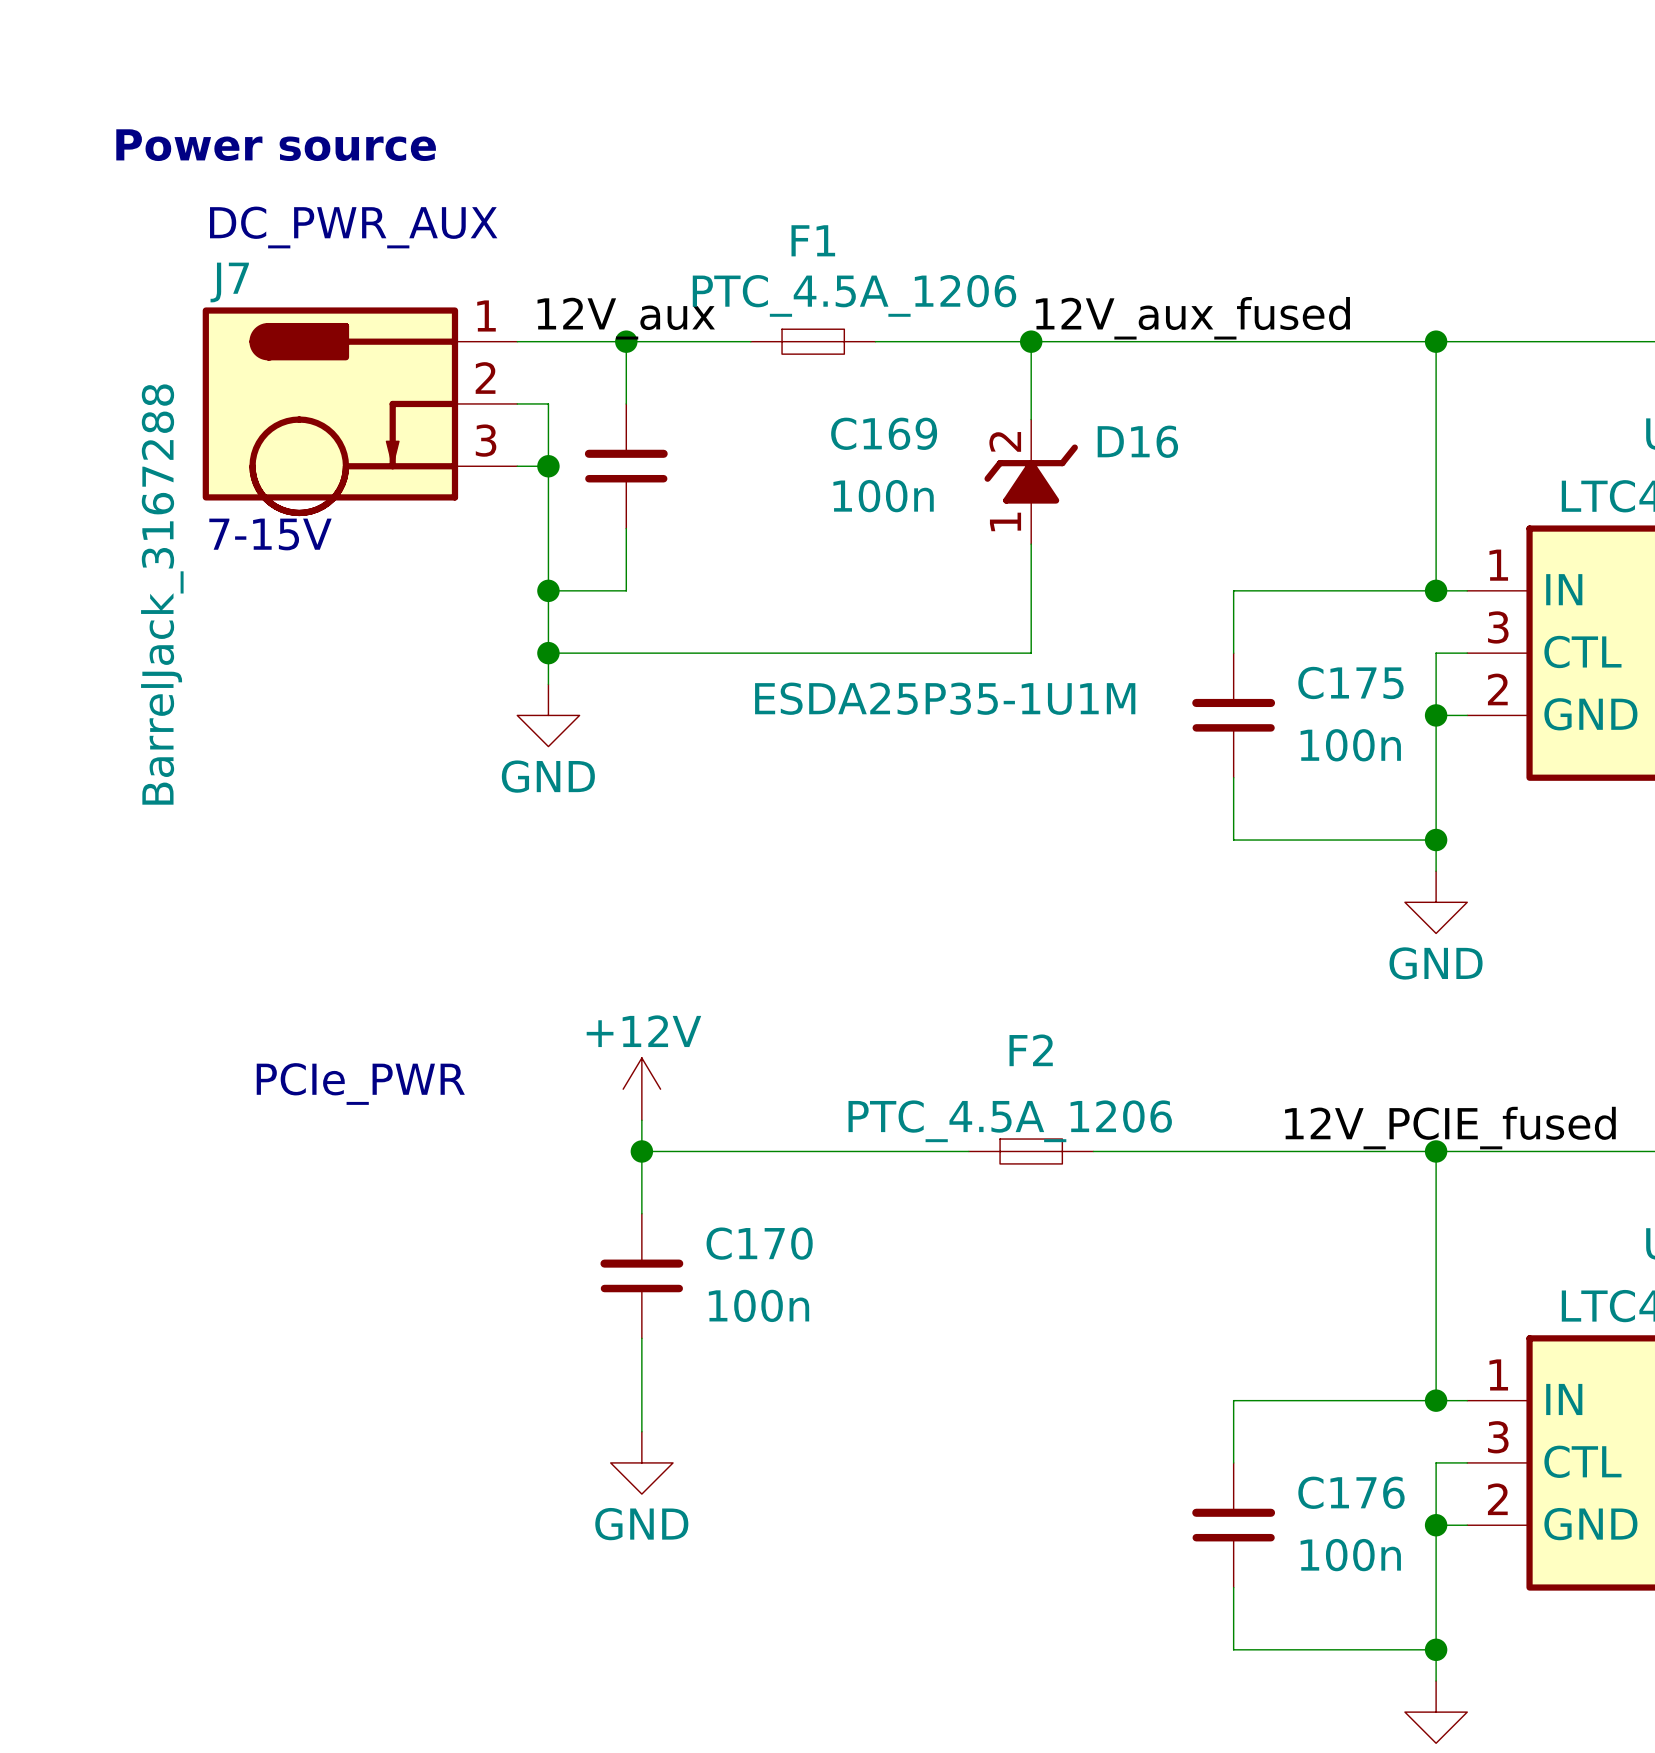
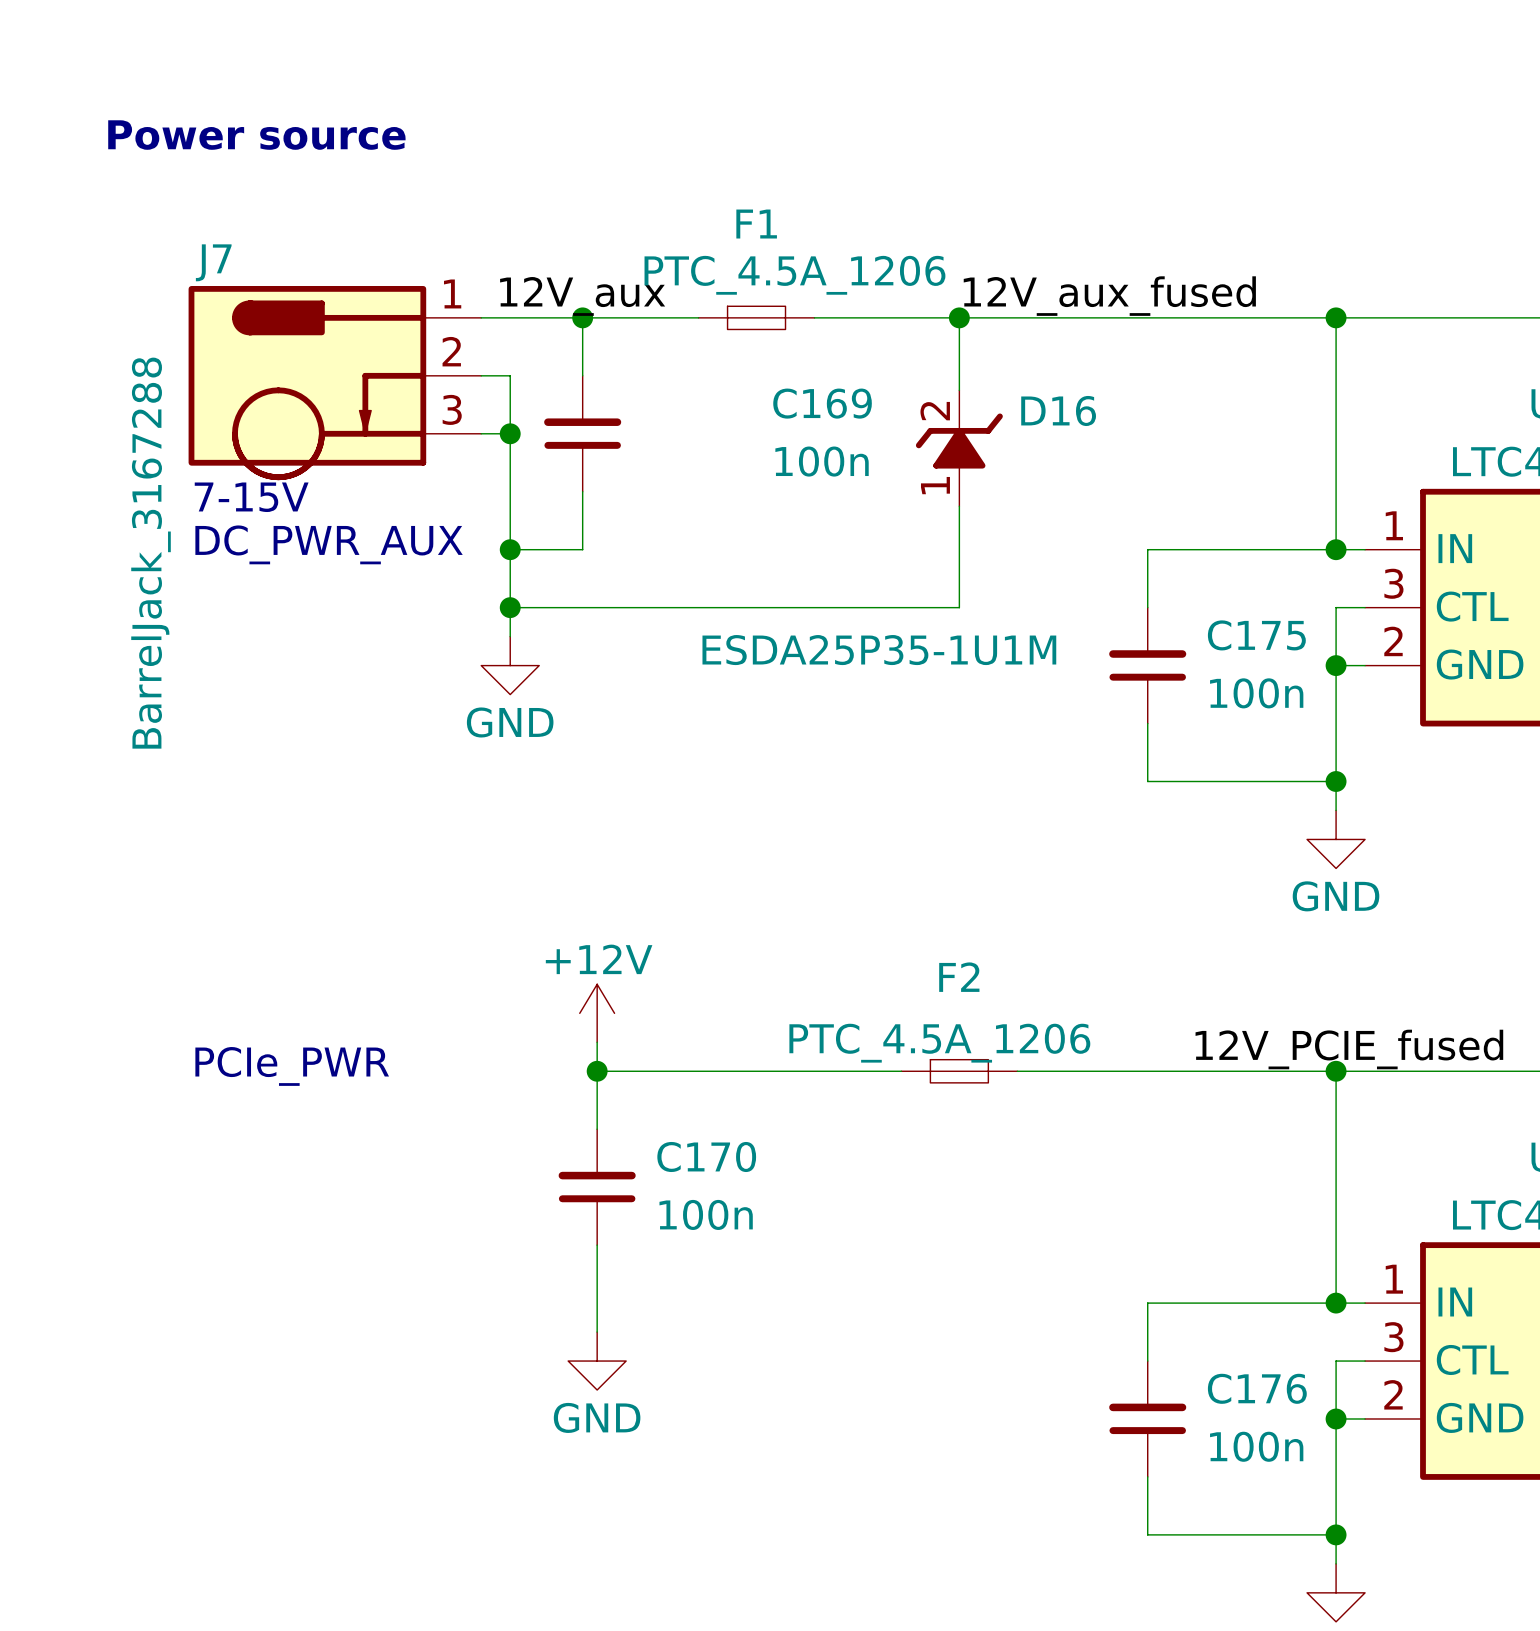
text position: DC_PWR_AUX (353, 227) -> DC_PWR_AUX (329, 544)
text position: PCIe_PWR (360, 1084) -> PCIe_PWR (292, 1066)

